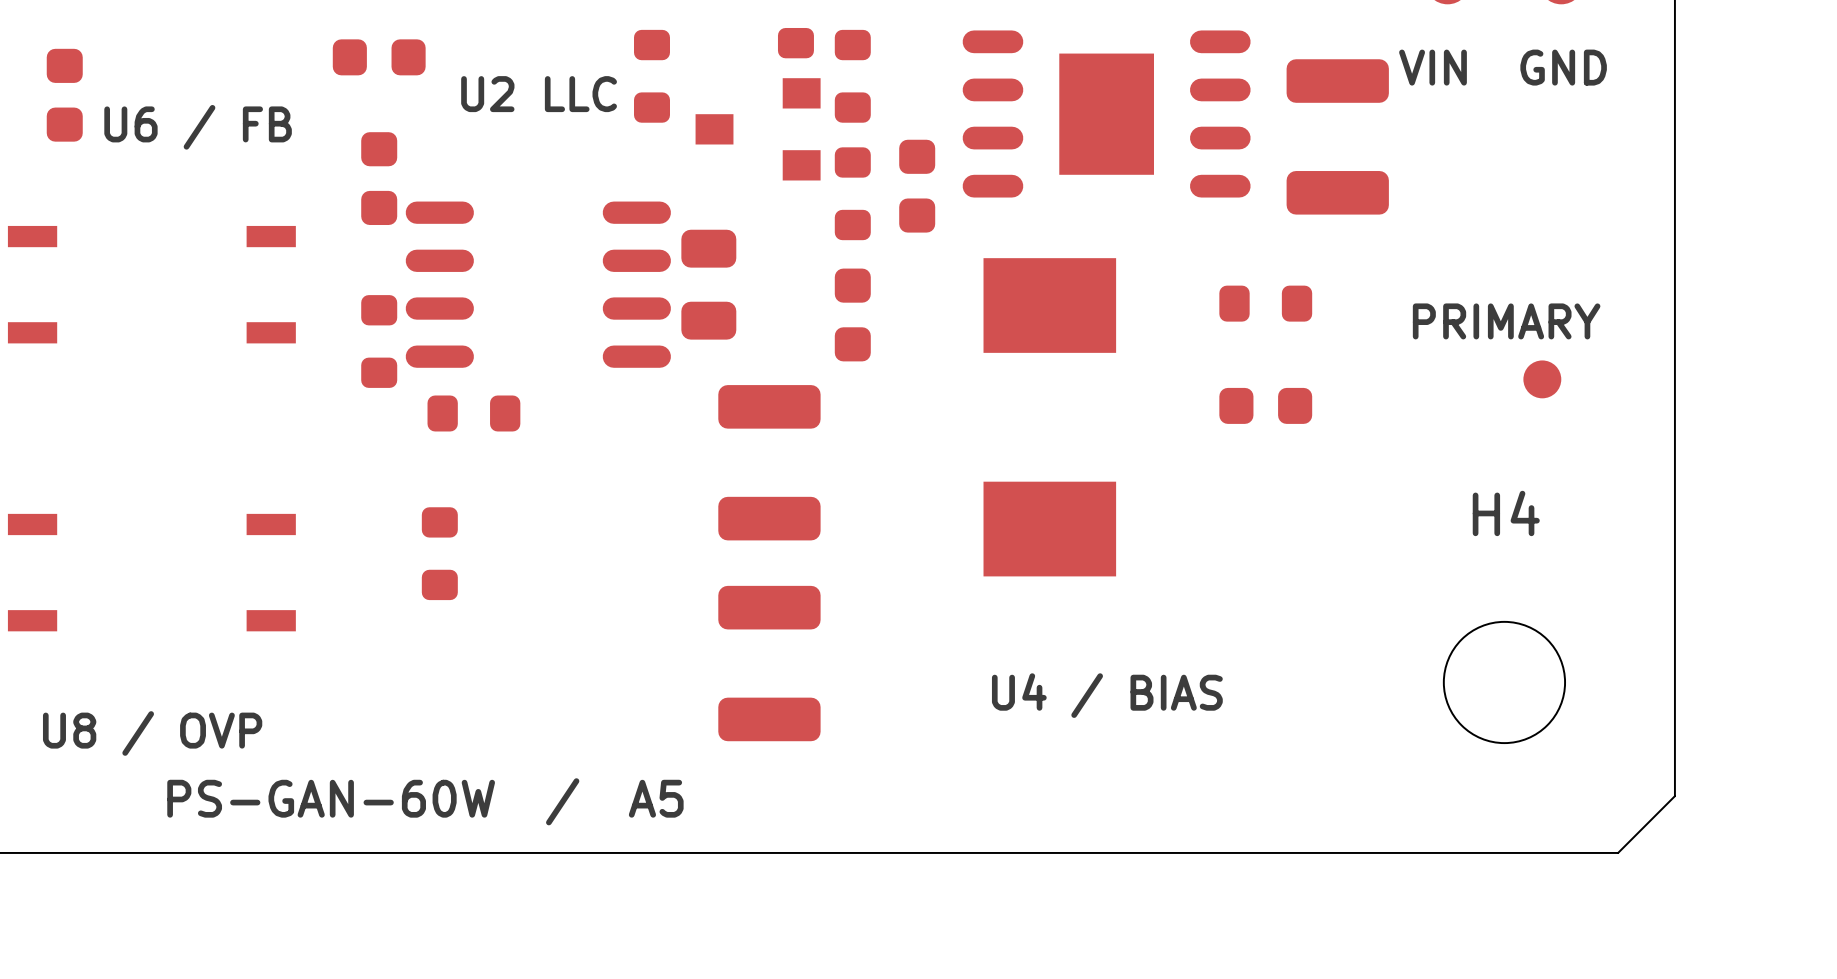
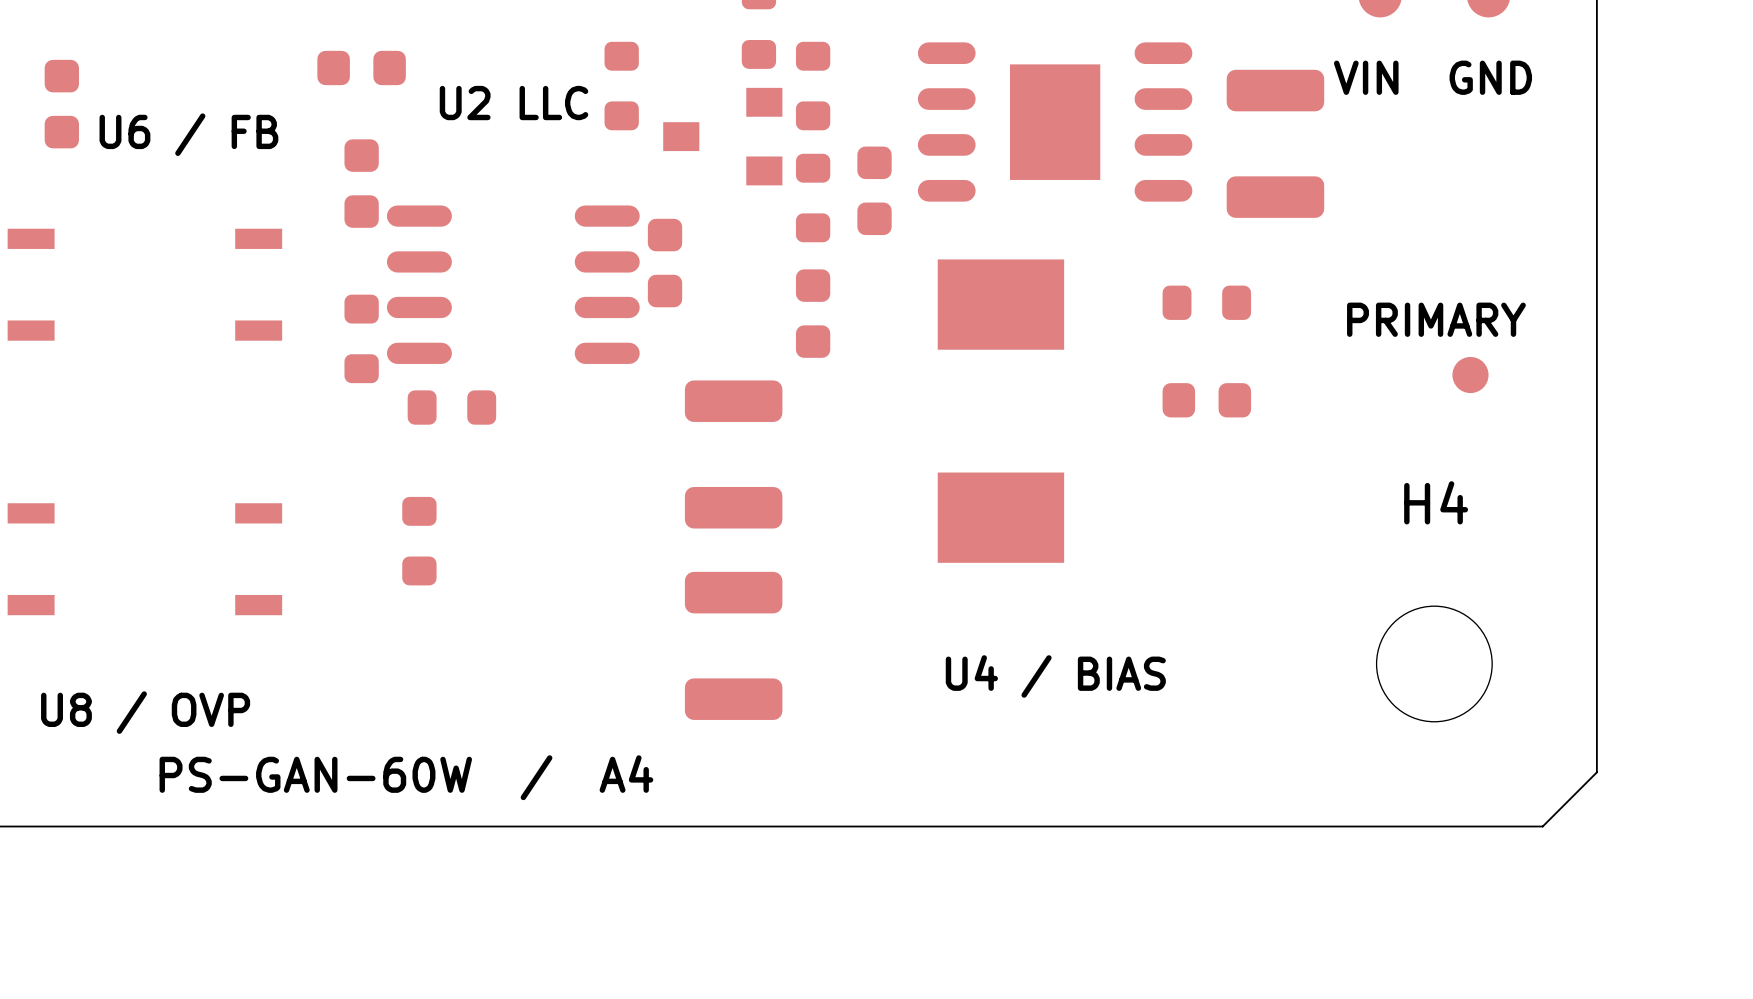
part footprint: [681, 229, 737, 340] -> [647, 218, 683, 308]
text: PS-GAN-60W / A5 (425, 801) -> PS-GAN-60W / A4 (406, 777)

